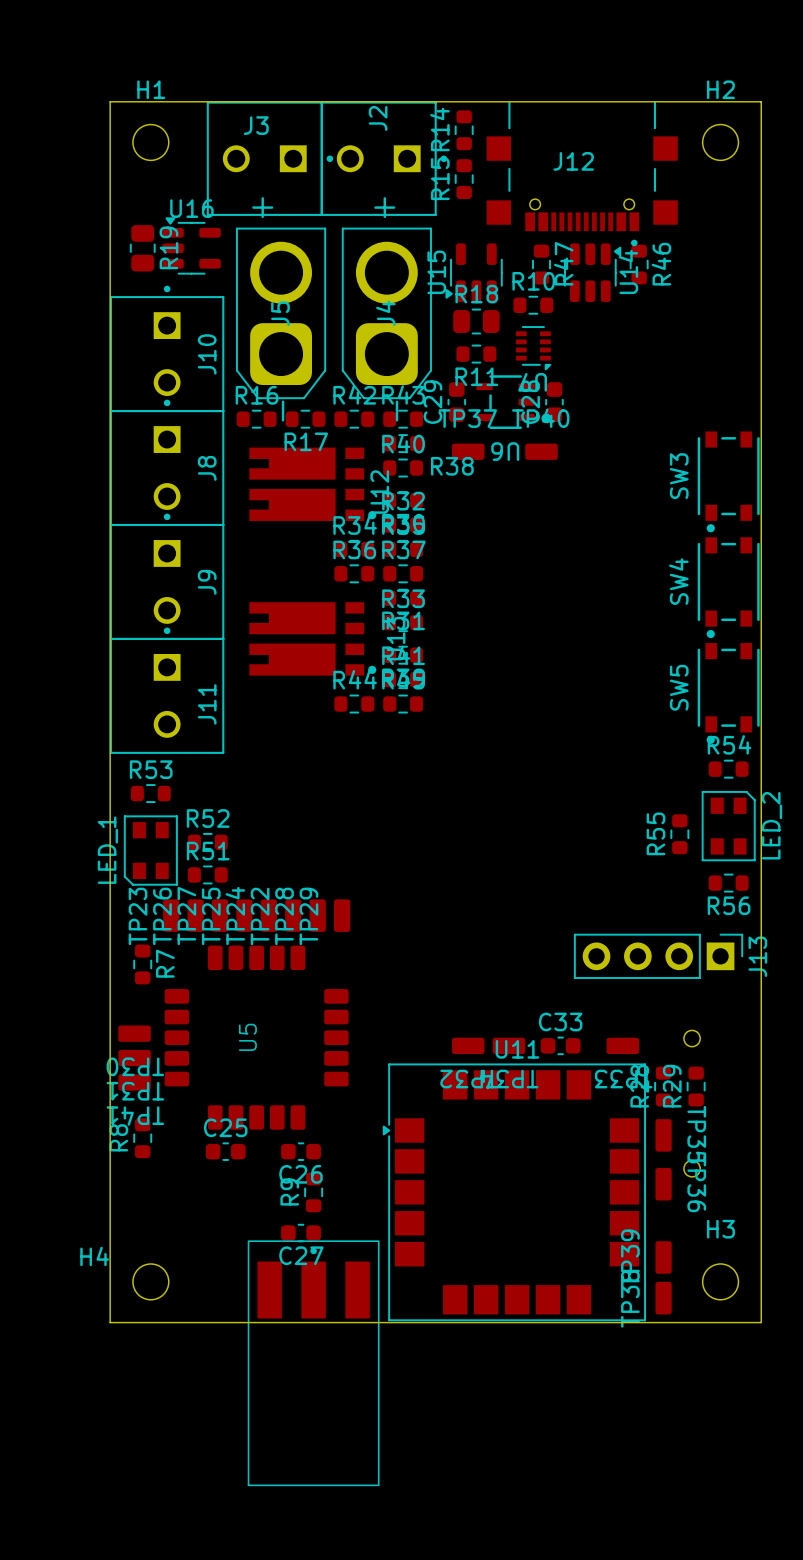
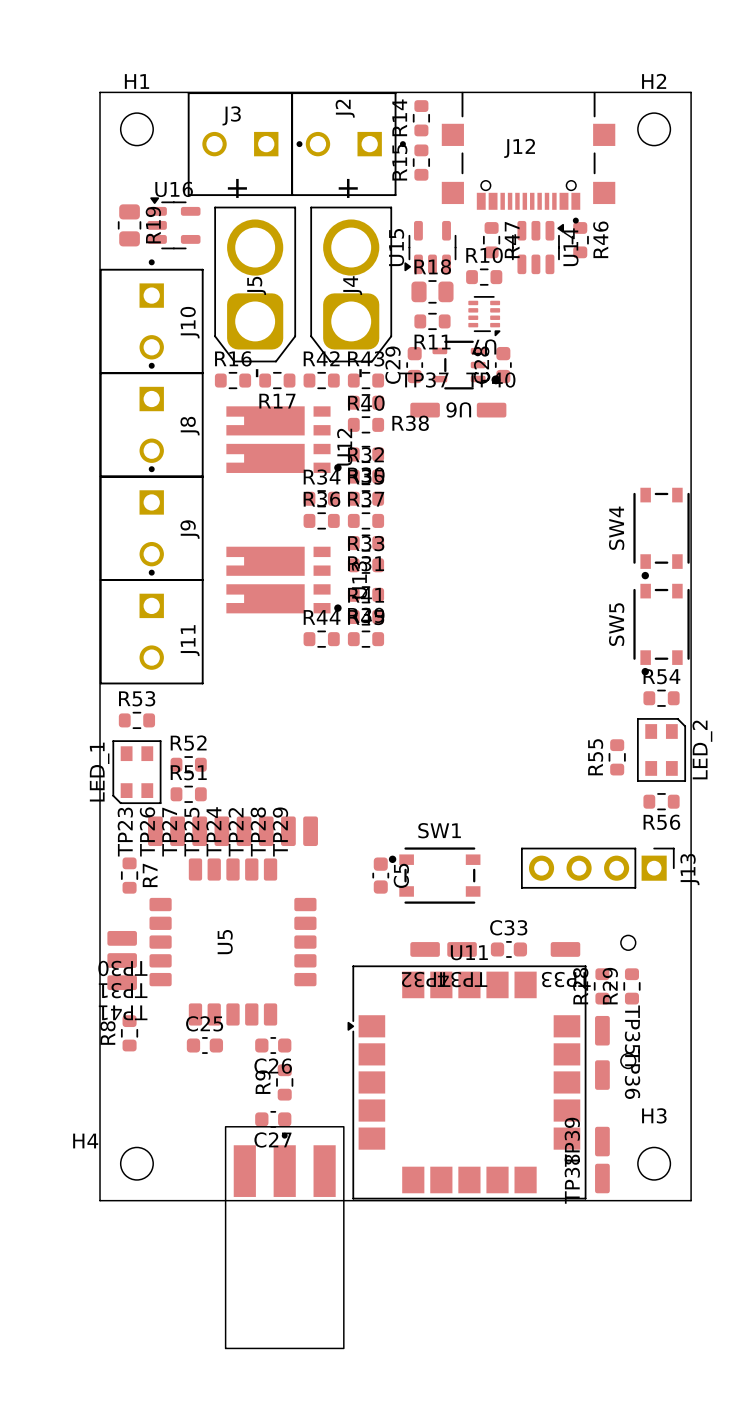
SW3: (728, 481) -> none
C5: none -> (380, 875)
SW1: none -> (434, 875)

